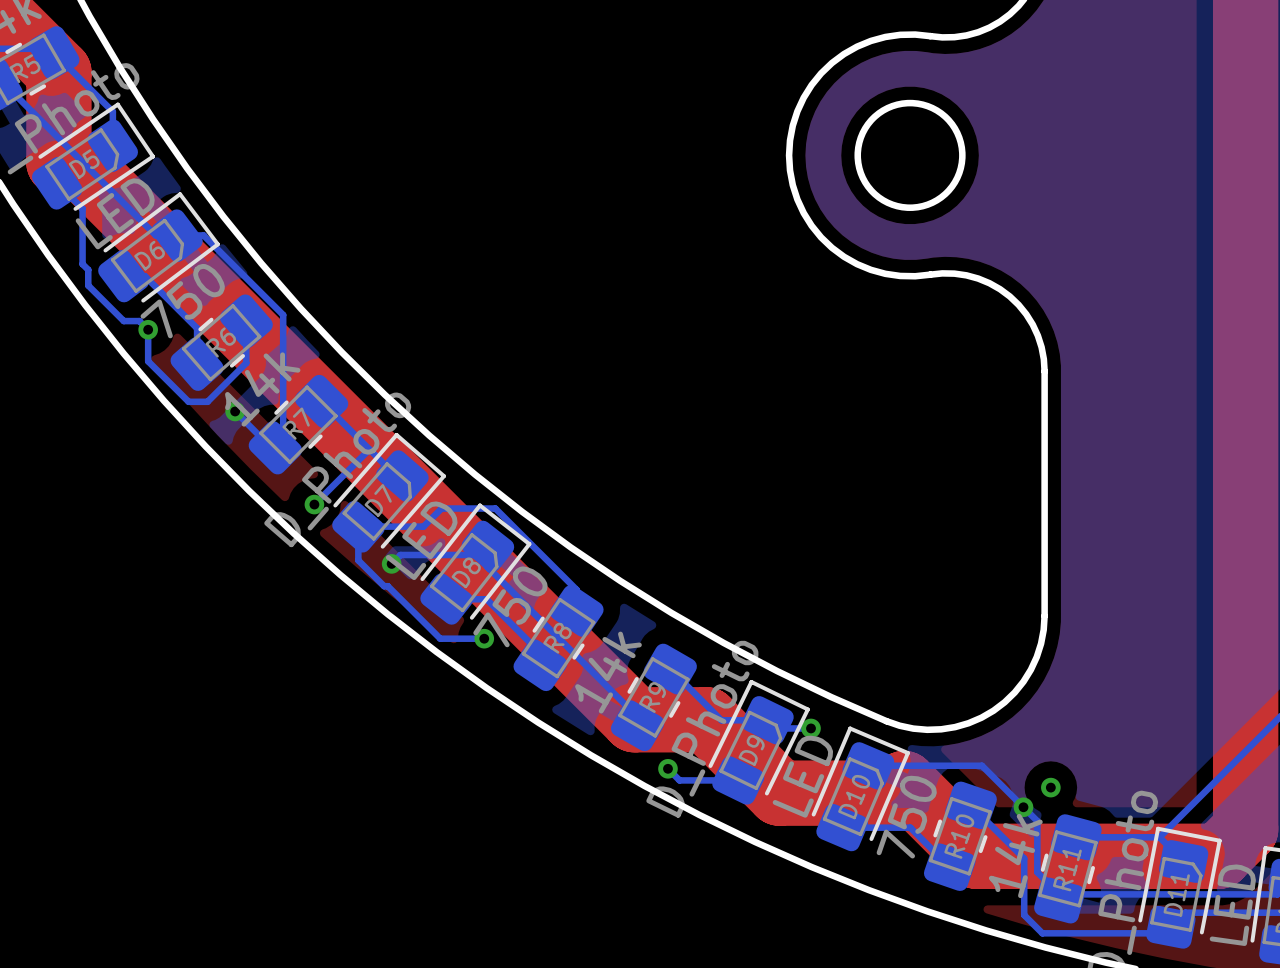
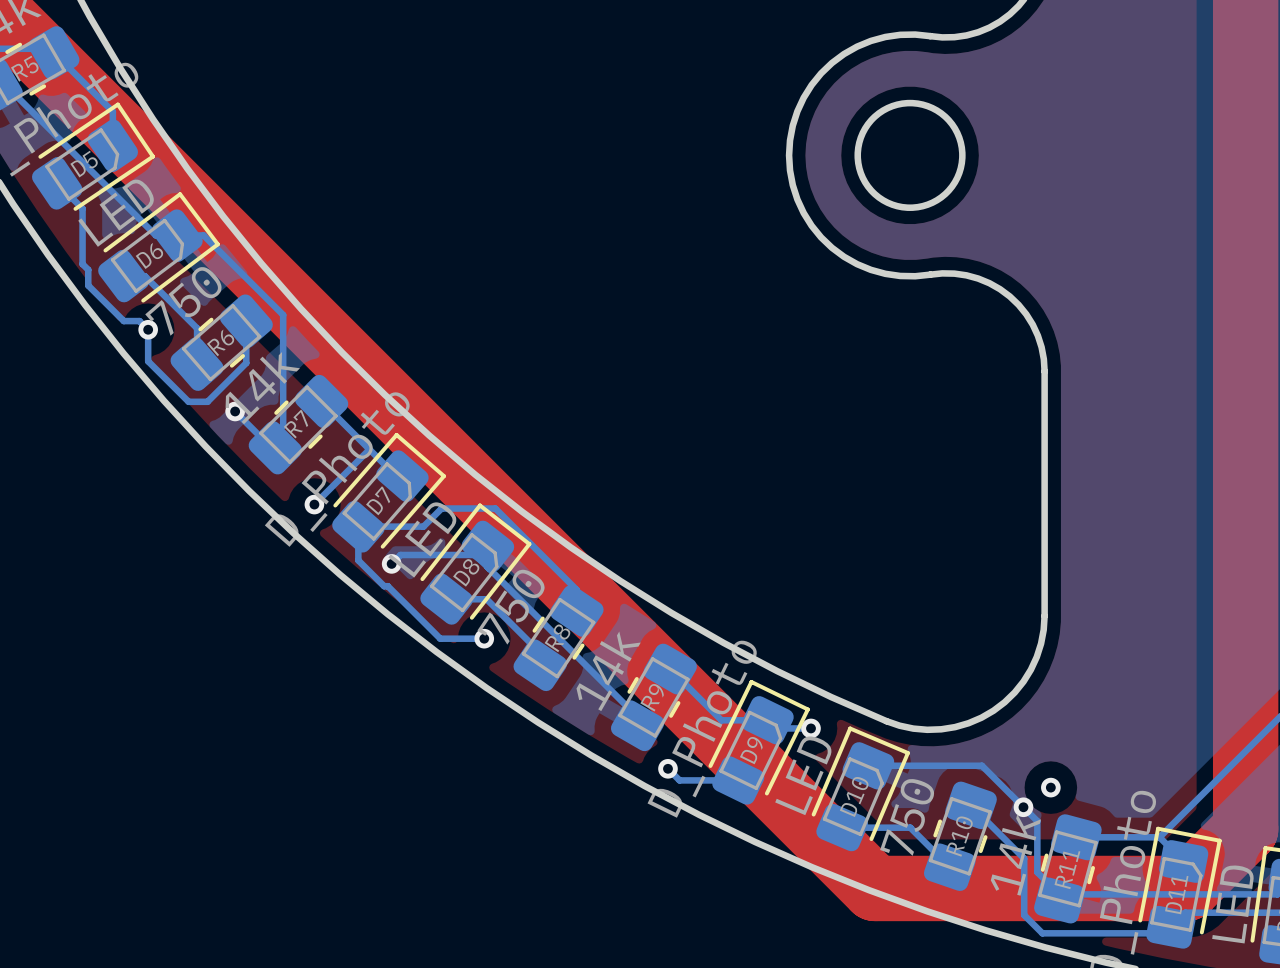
top track: (58, 72) (58, 162) (77, 162) (634, 719) (706, 719) -> (58, 72) (706, 719)
top track: (779, 793) (894, 793) (904, 783) (976, 856) (1218, 856) -> (779, 793) (874, 888) (1186, 888) (1218, 856)

